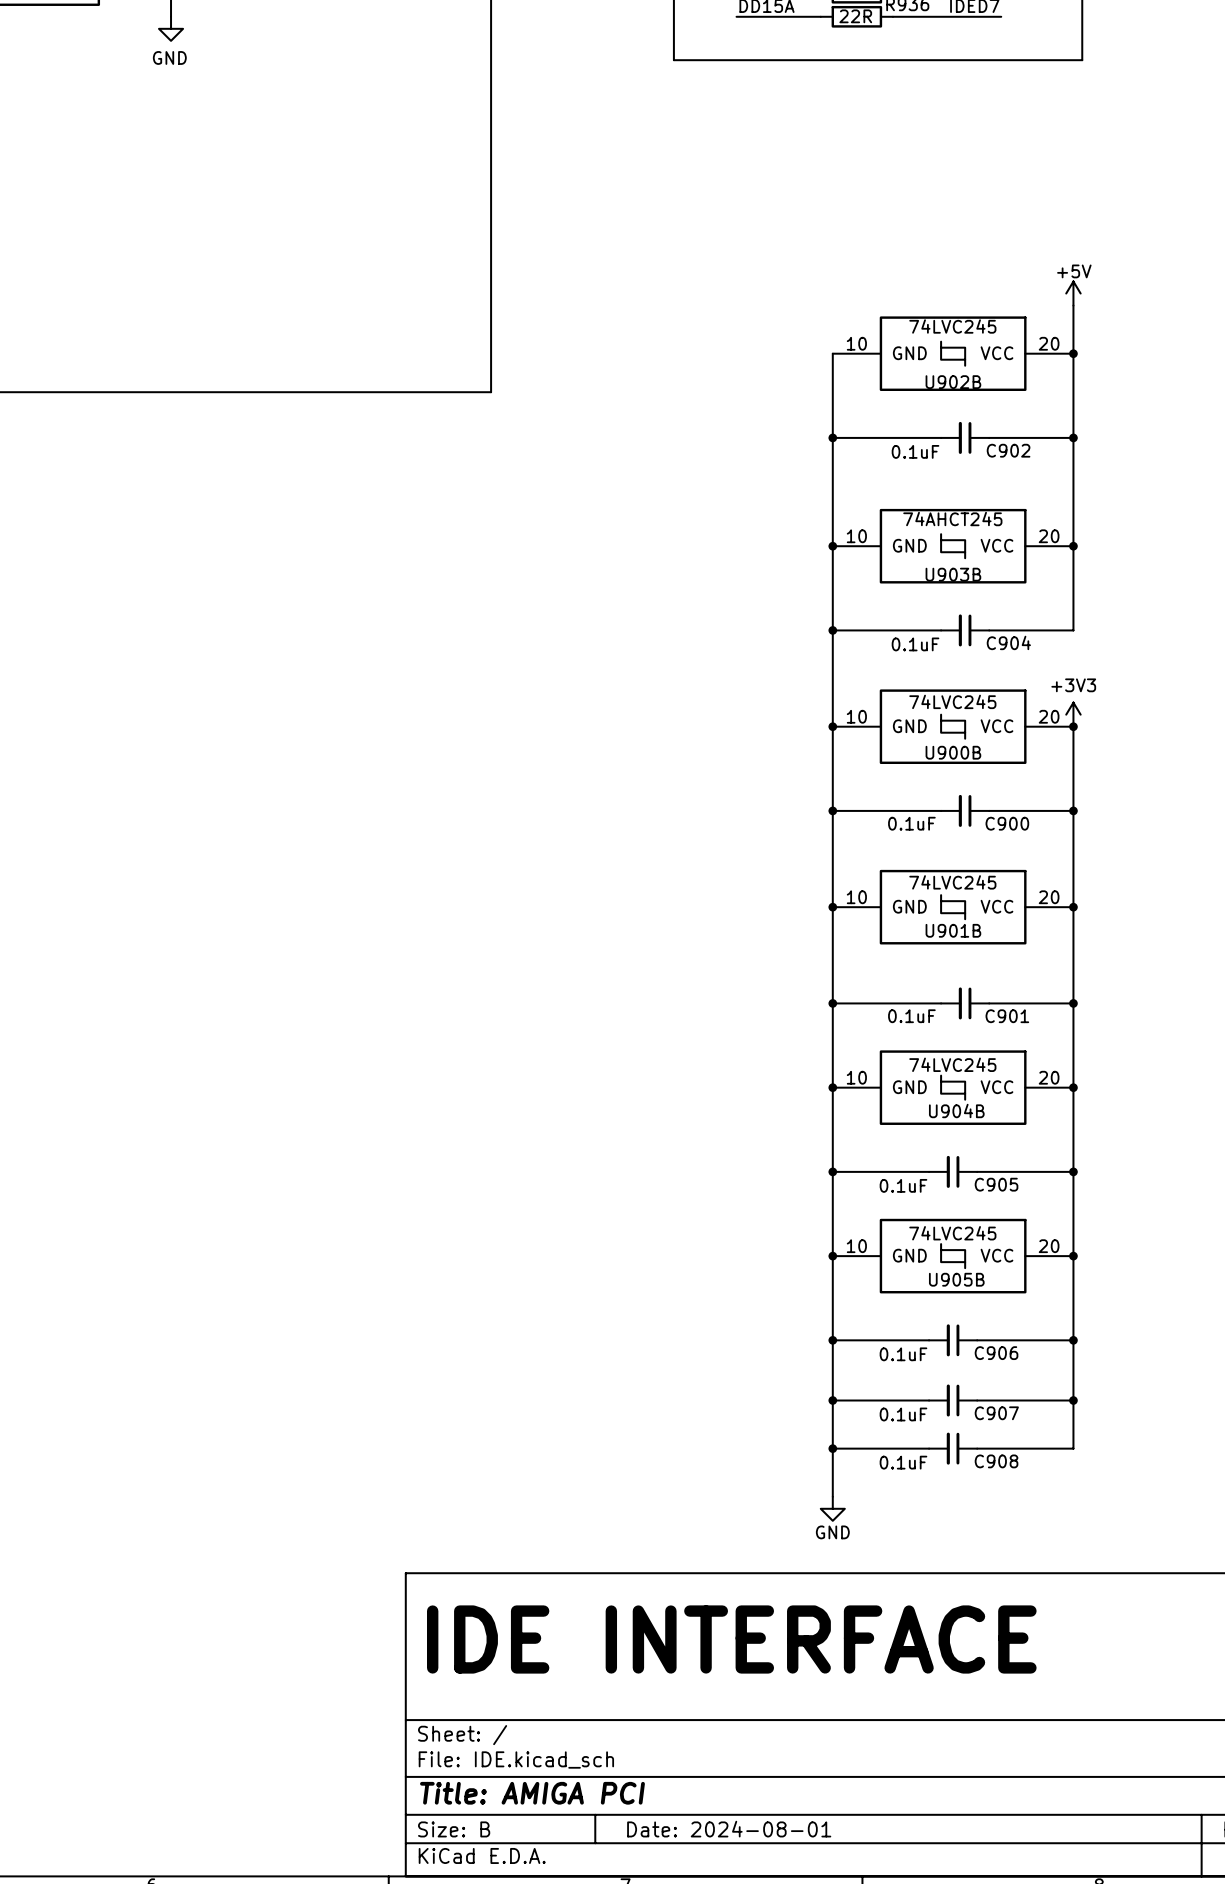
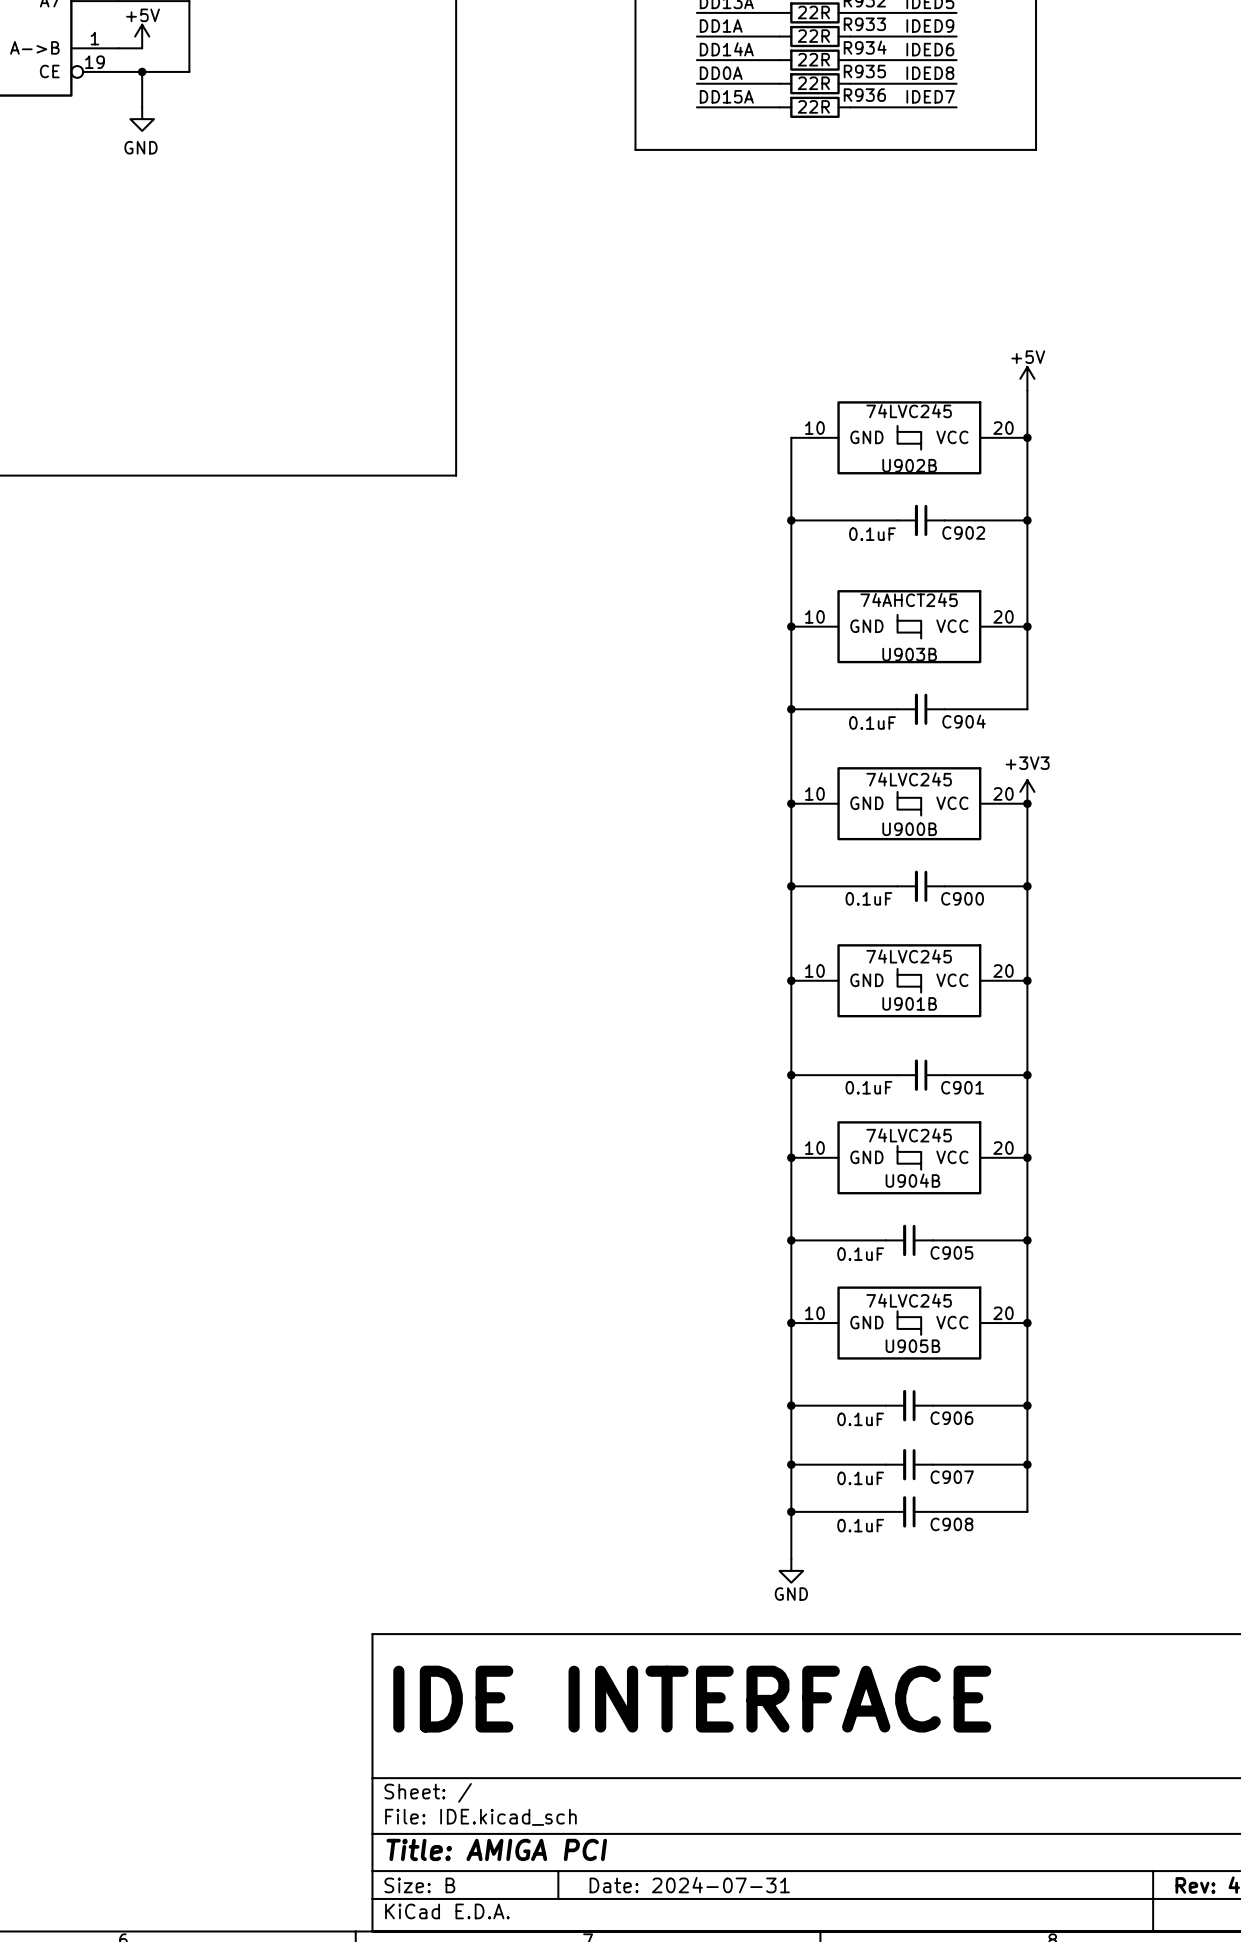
title block: Date: 2024-08-01 (729, 1829) -> Date: 2024-07-31 (689, 1885)

